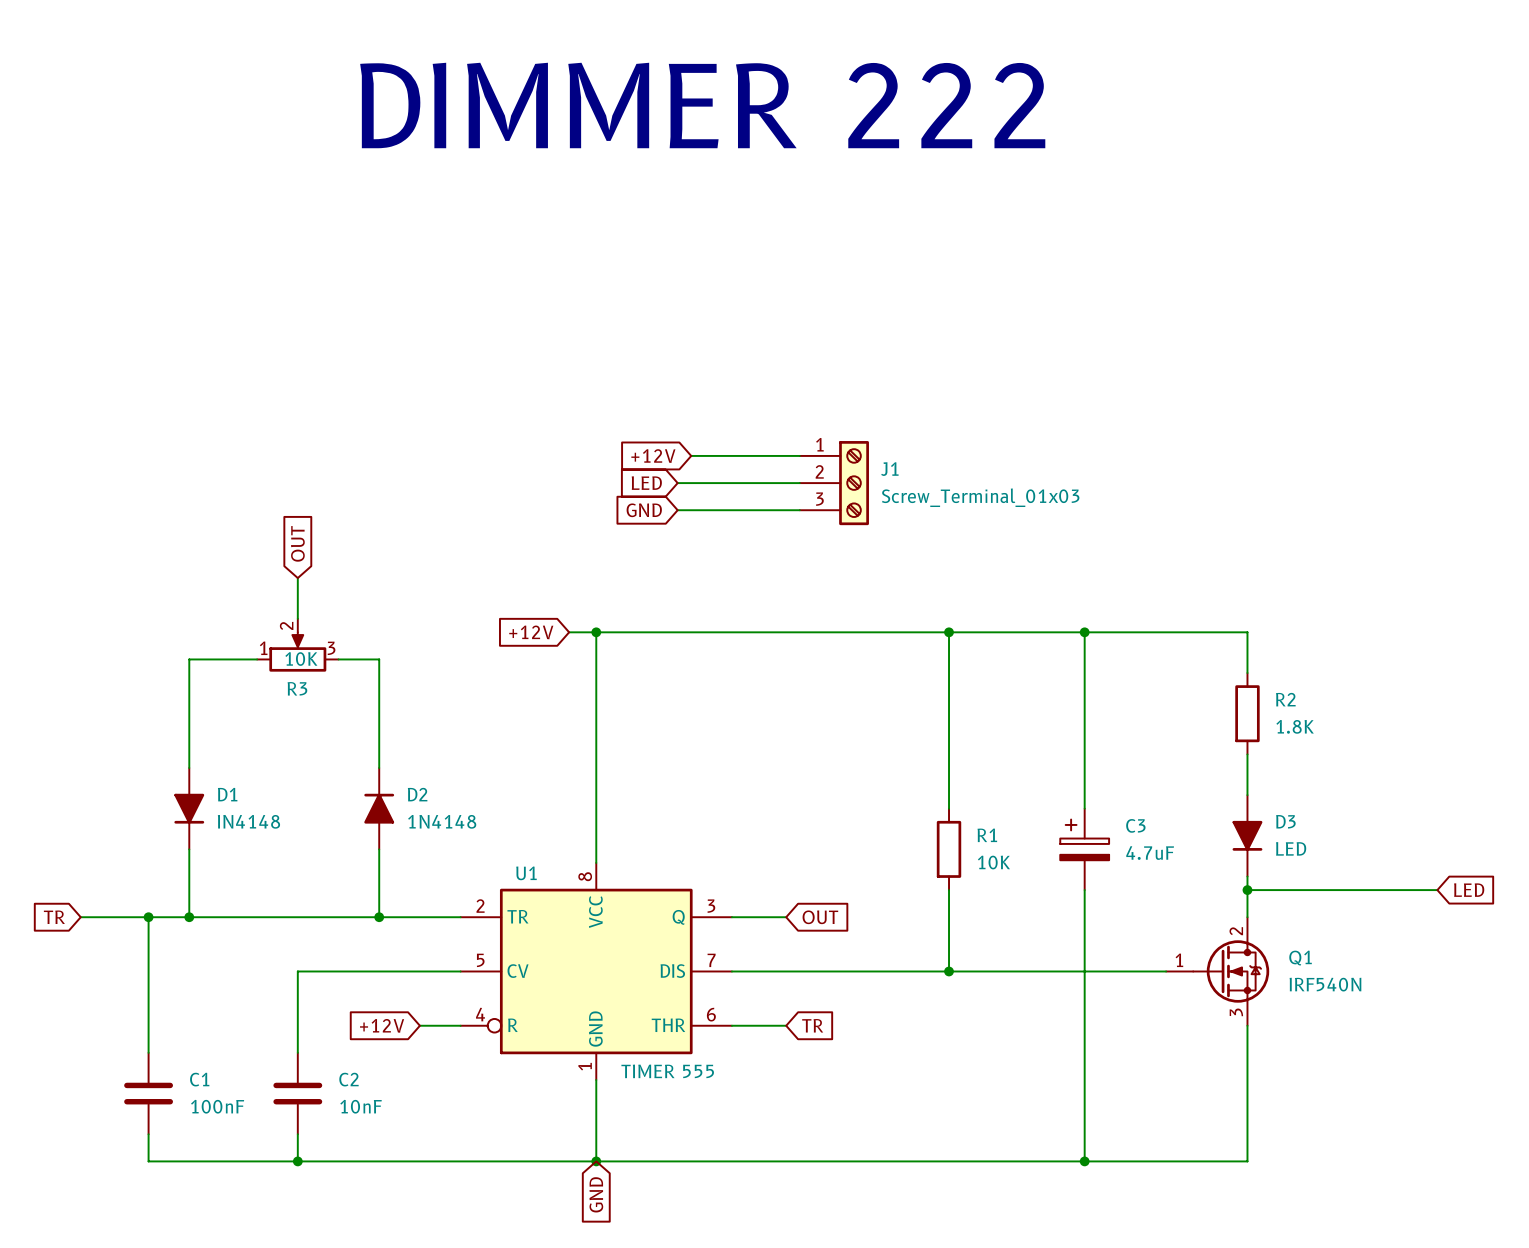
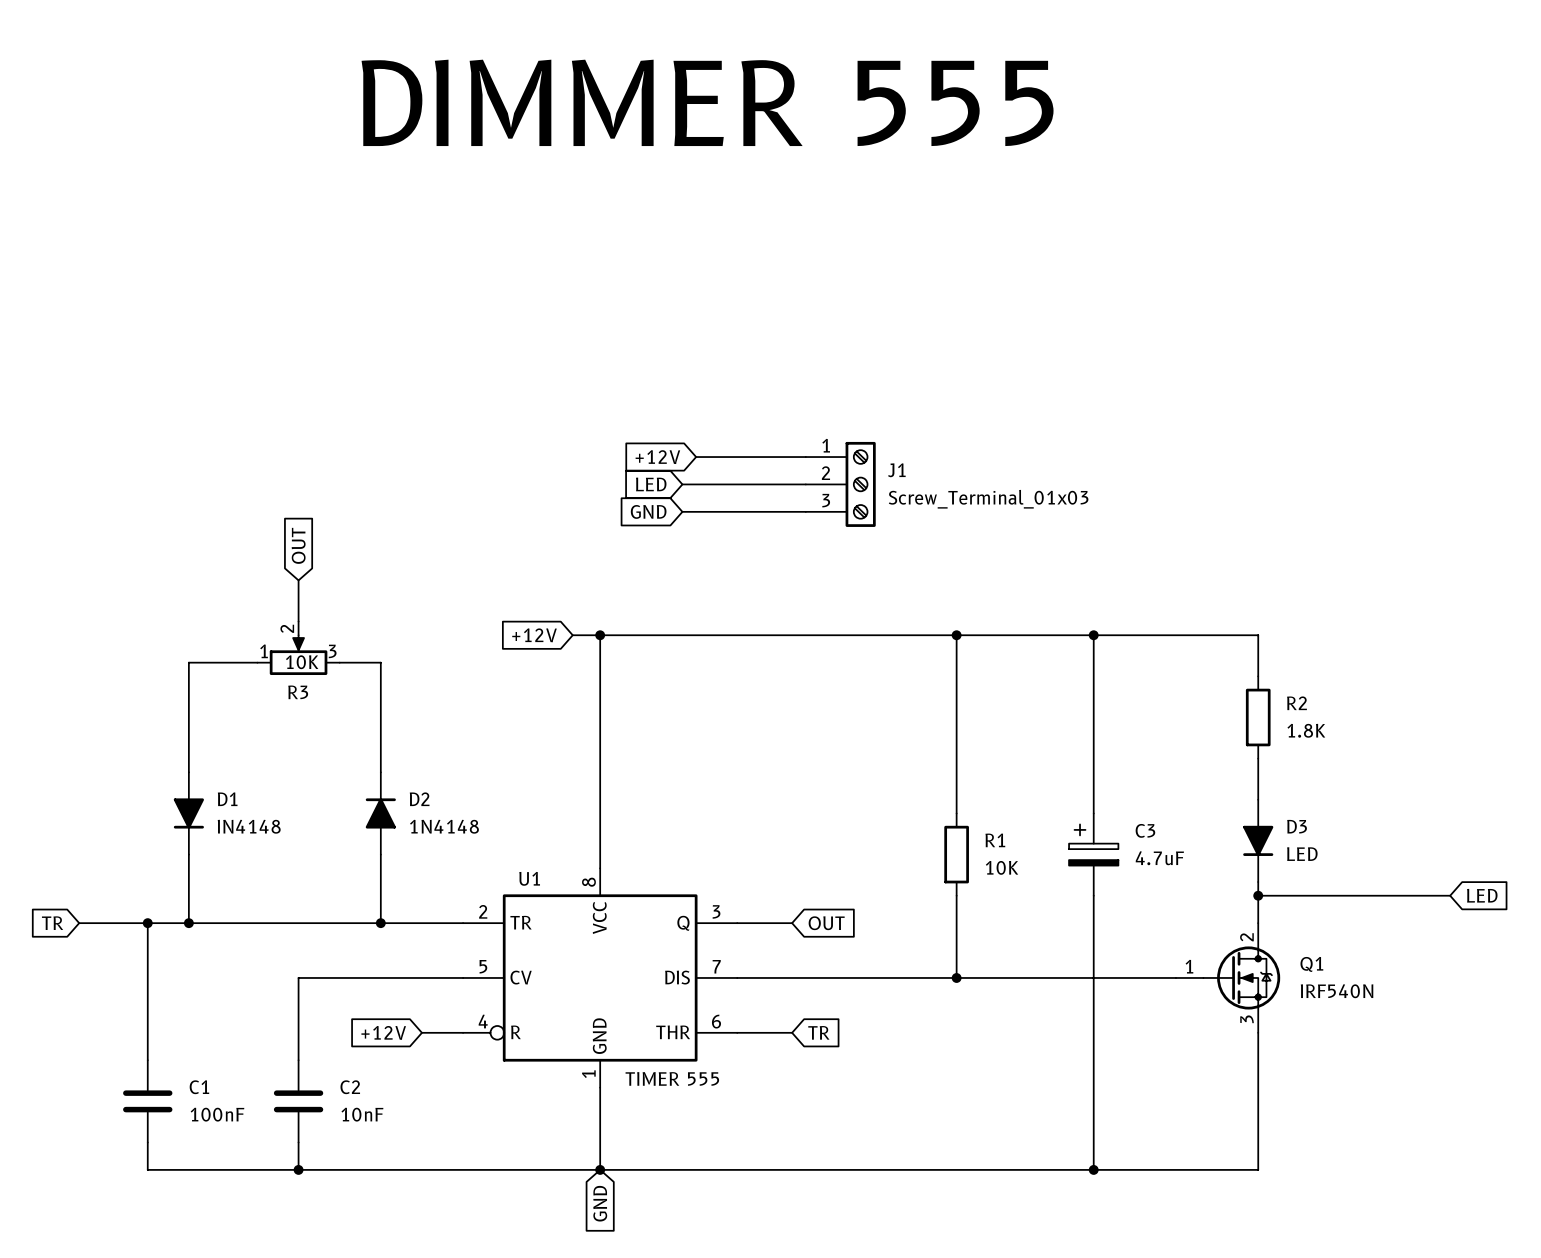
text: DIMMER 222 (702, 105) -> DIMMER 555 (707, 102)

